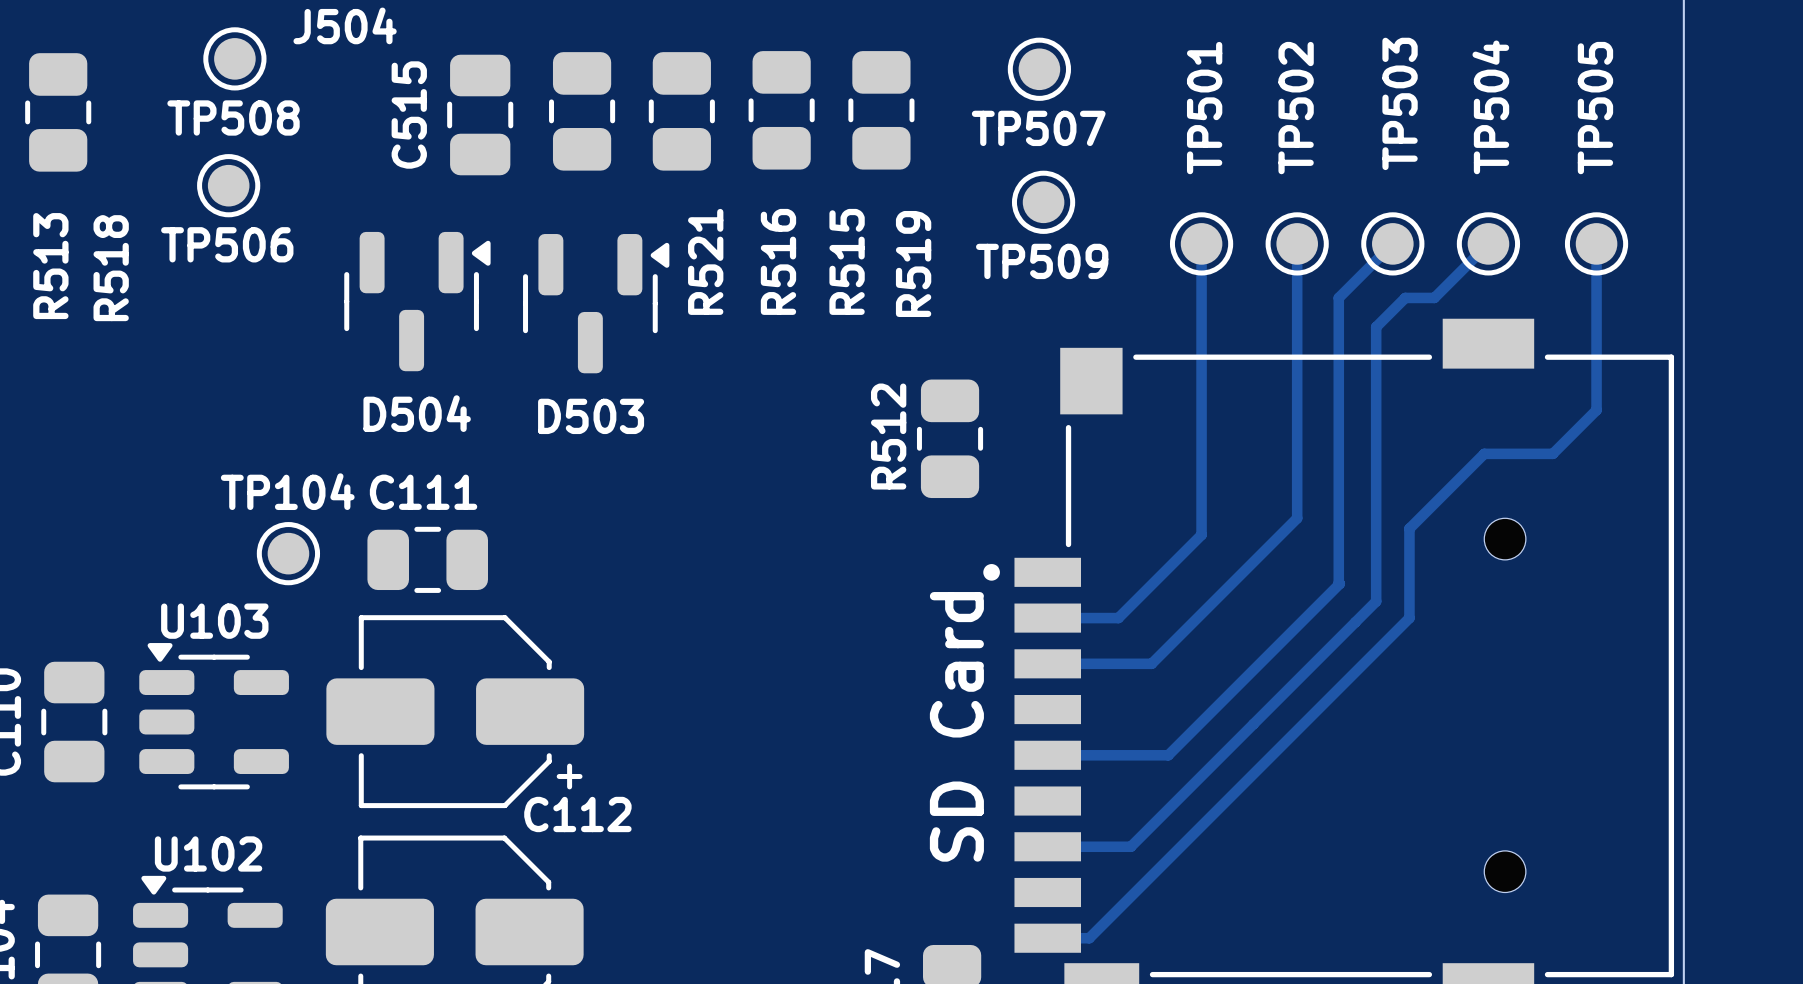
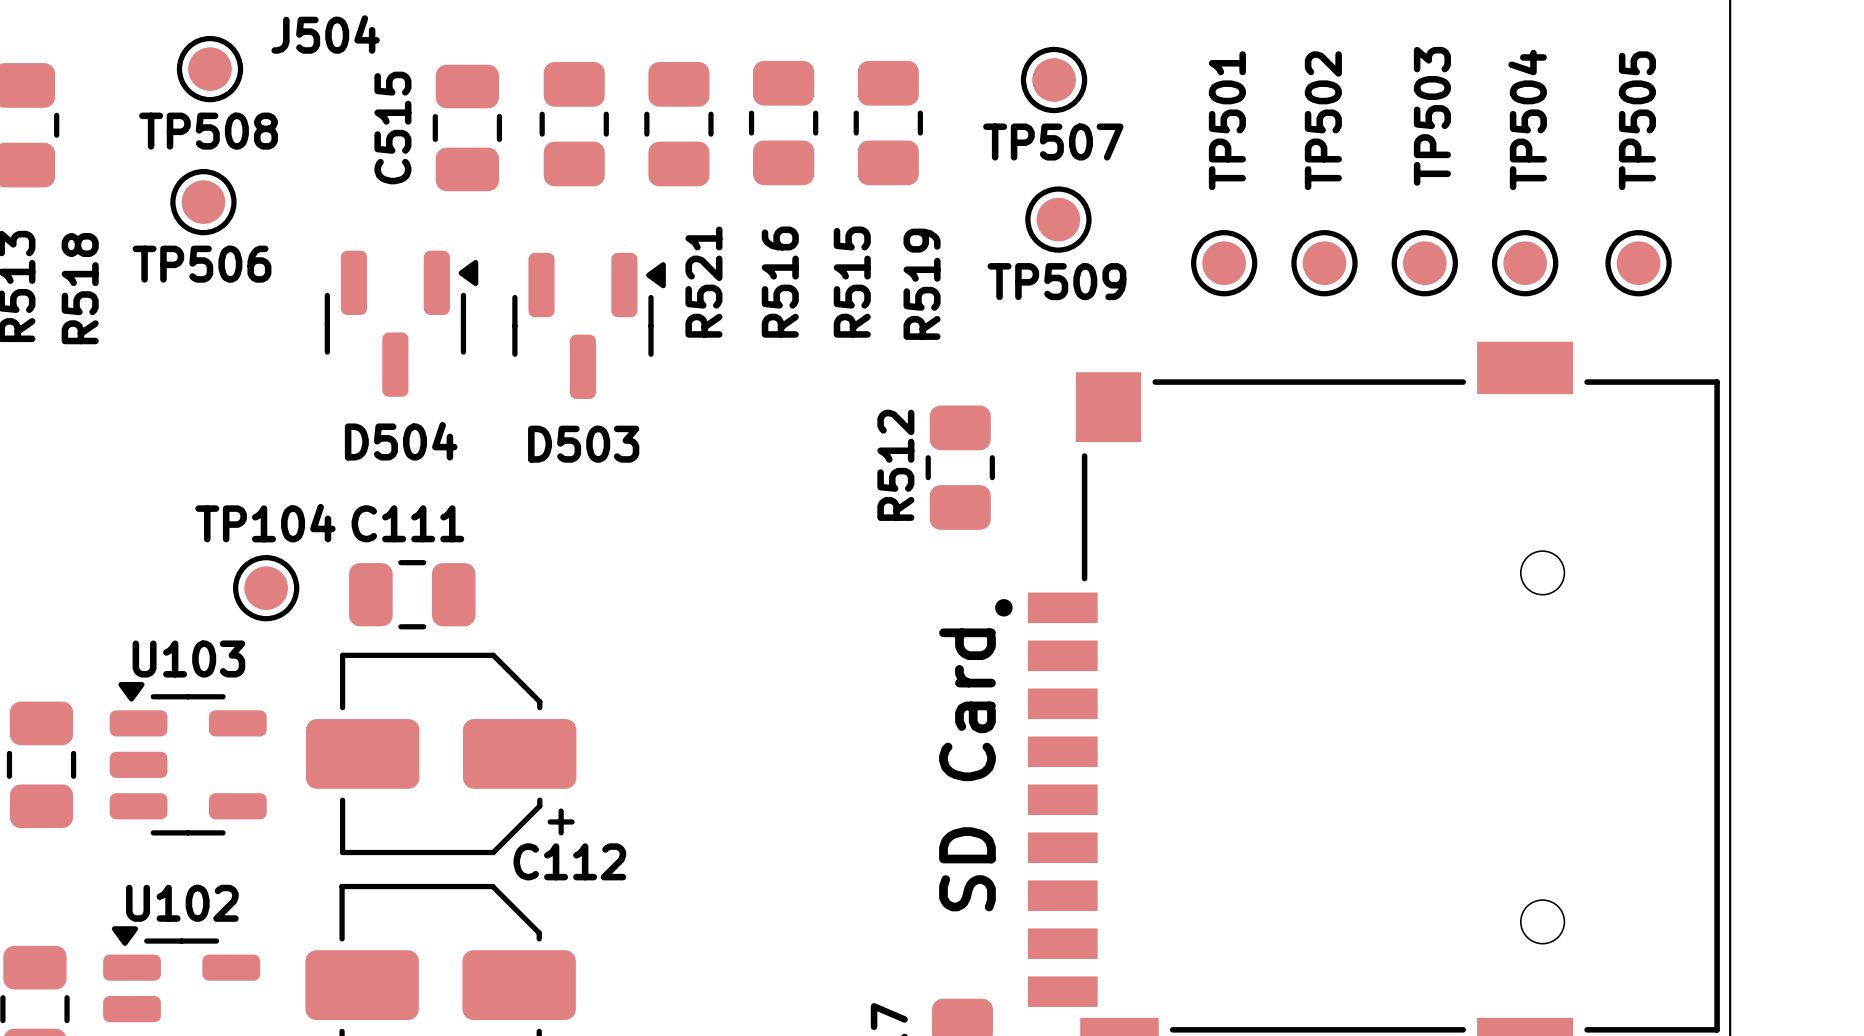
track: (1201, 243) (1201, 534) (1118, 618) (1047, 618) -> none
track: (1297, 243) (1297, 518) (1151, 663) (1047, 663) -> none
track: (1392, 243) (1338, 297) (1339, 583) (1168, 755) (1047, 755) -> none
track: (1488, 243) (1434, 297) (1405, 297) (1376, 327) (1376, 601) (1130, 846) (1047, 846) -> none
track: (1596, 243) (1596, 410) (1552, 453) (1484, 453) (1409, 528) (1409, 618) (1089, 938) (1047, 938) -> none

